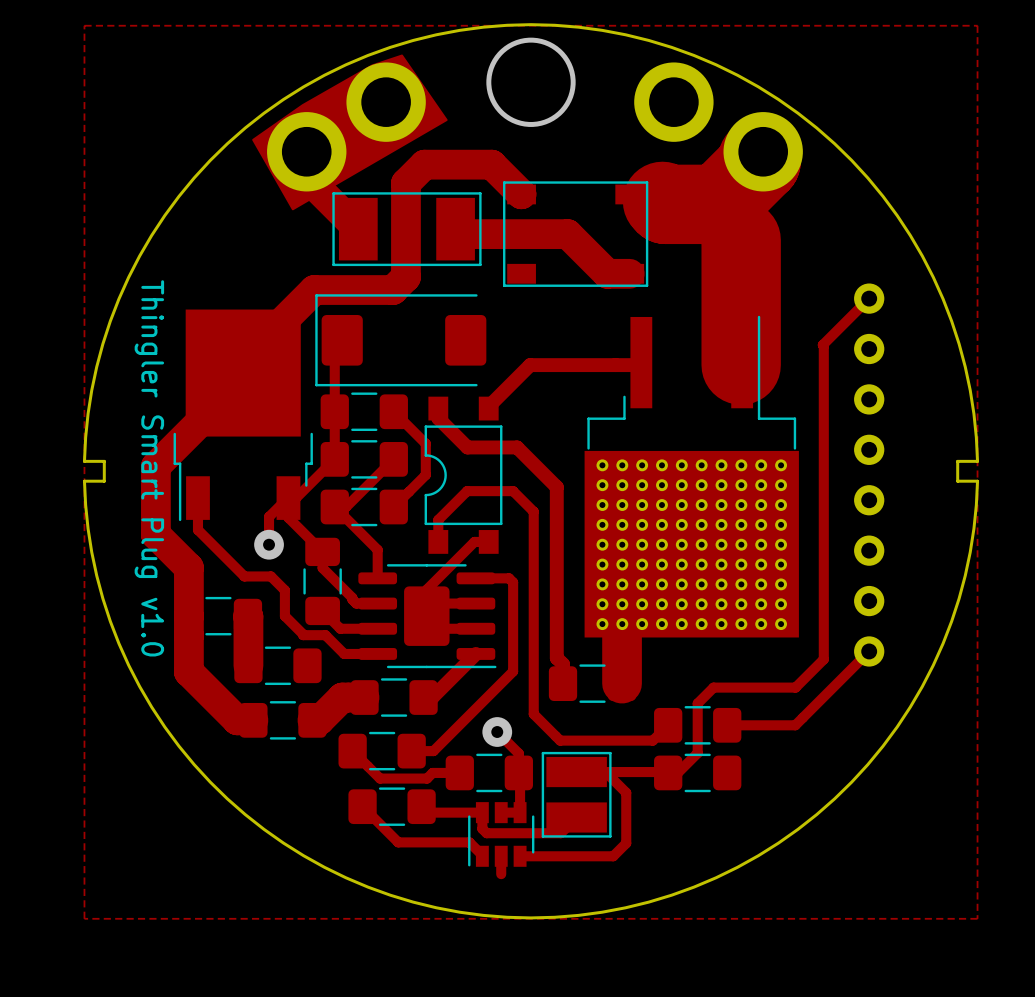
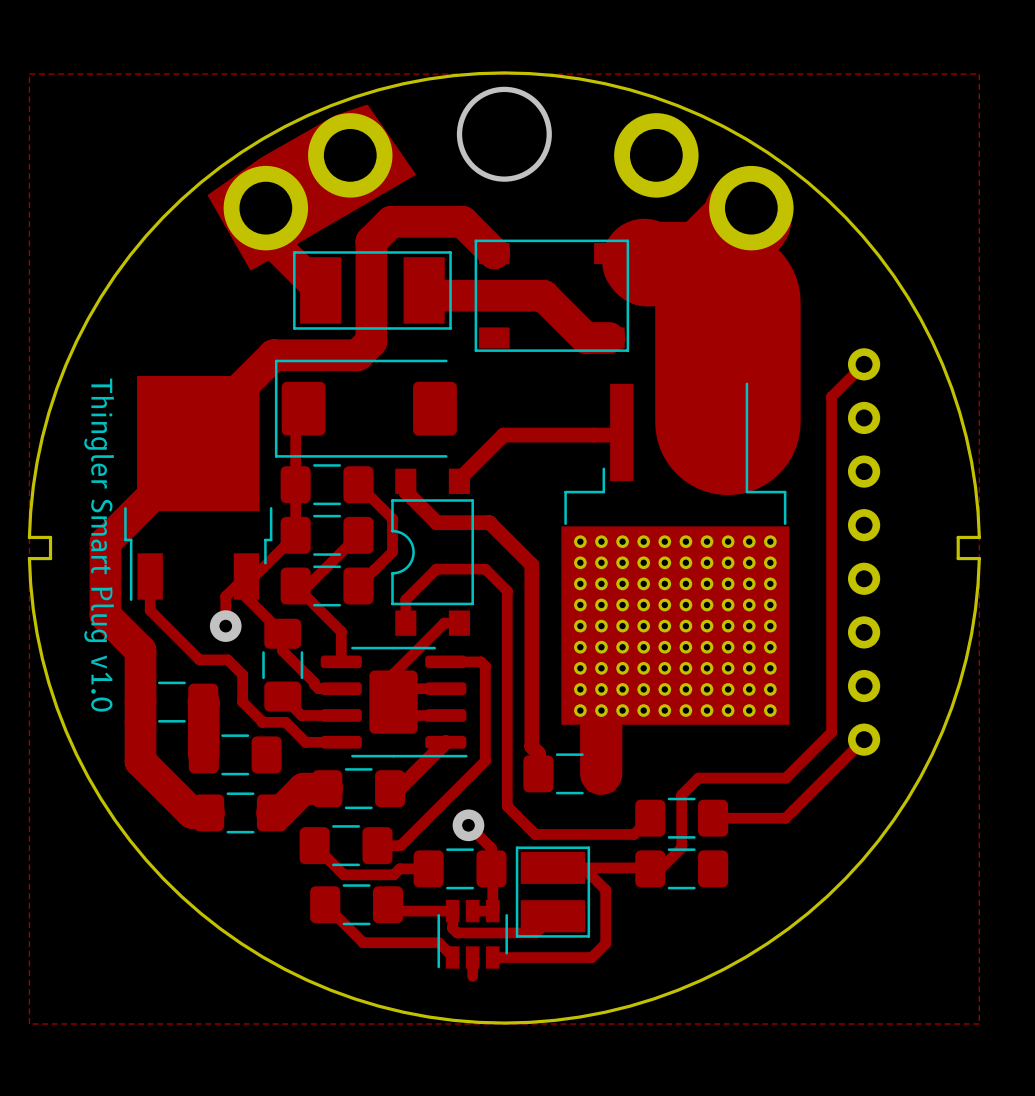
track width: thin (741, 240) (741, 353) -> thick (727, 302) (727, 422)
track: (838, 329) (822, 344) (823, 659) -> (831, 396) (831, 732) (815, 748)

